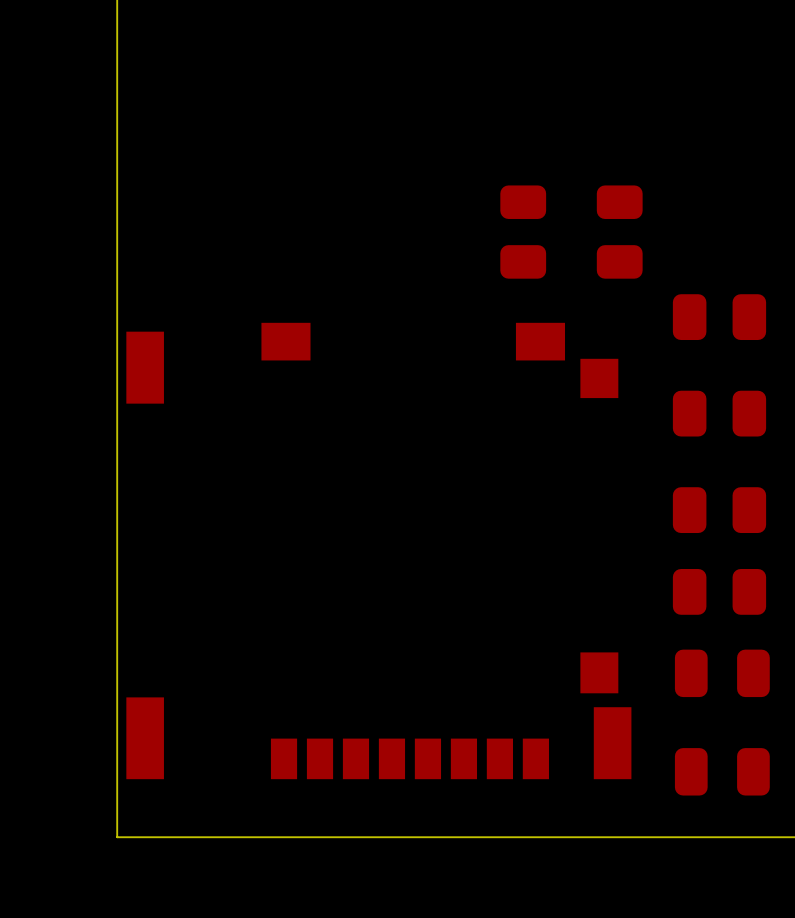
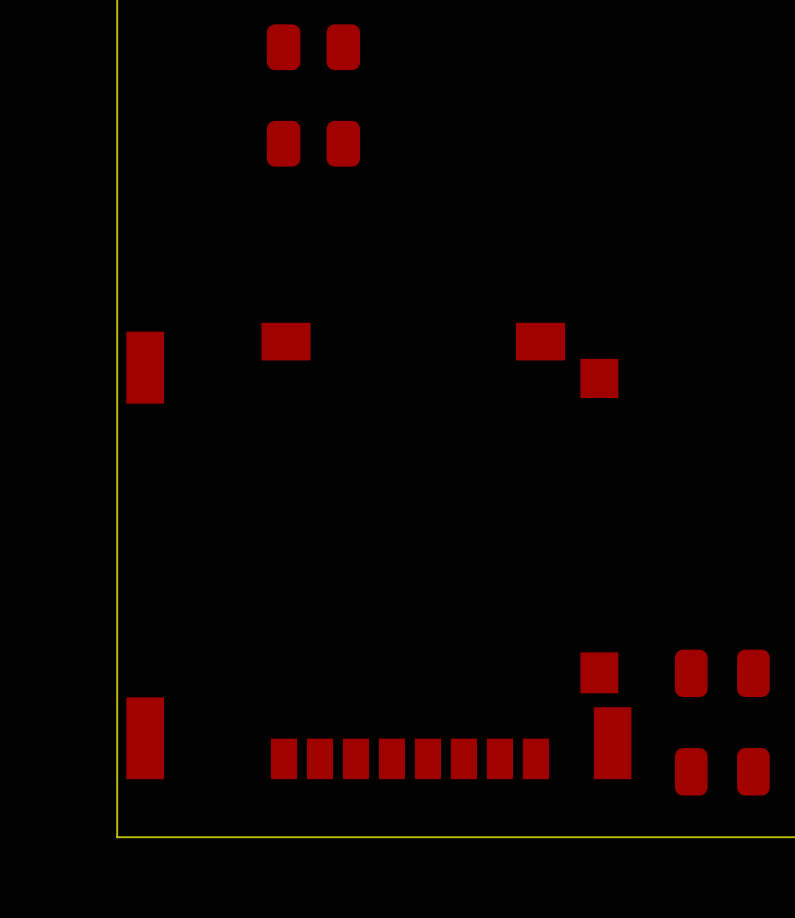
part: none -> (313, 47)
part: none -> (313, 143)
part: (523, 232) -> none
part: (619, 232) -> none
part: (719, 317) -> none
part: (719, 413) -> none
part: (719, 510) -> none
part: (719, 591) -> none

